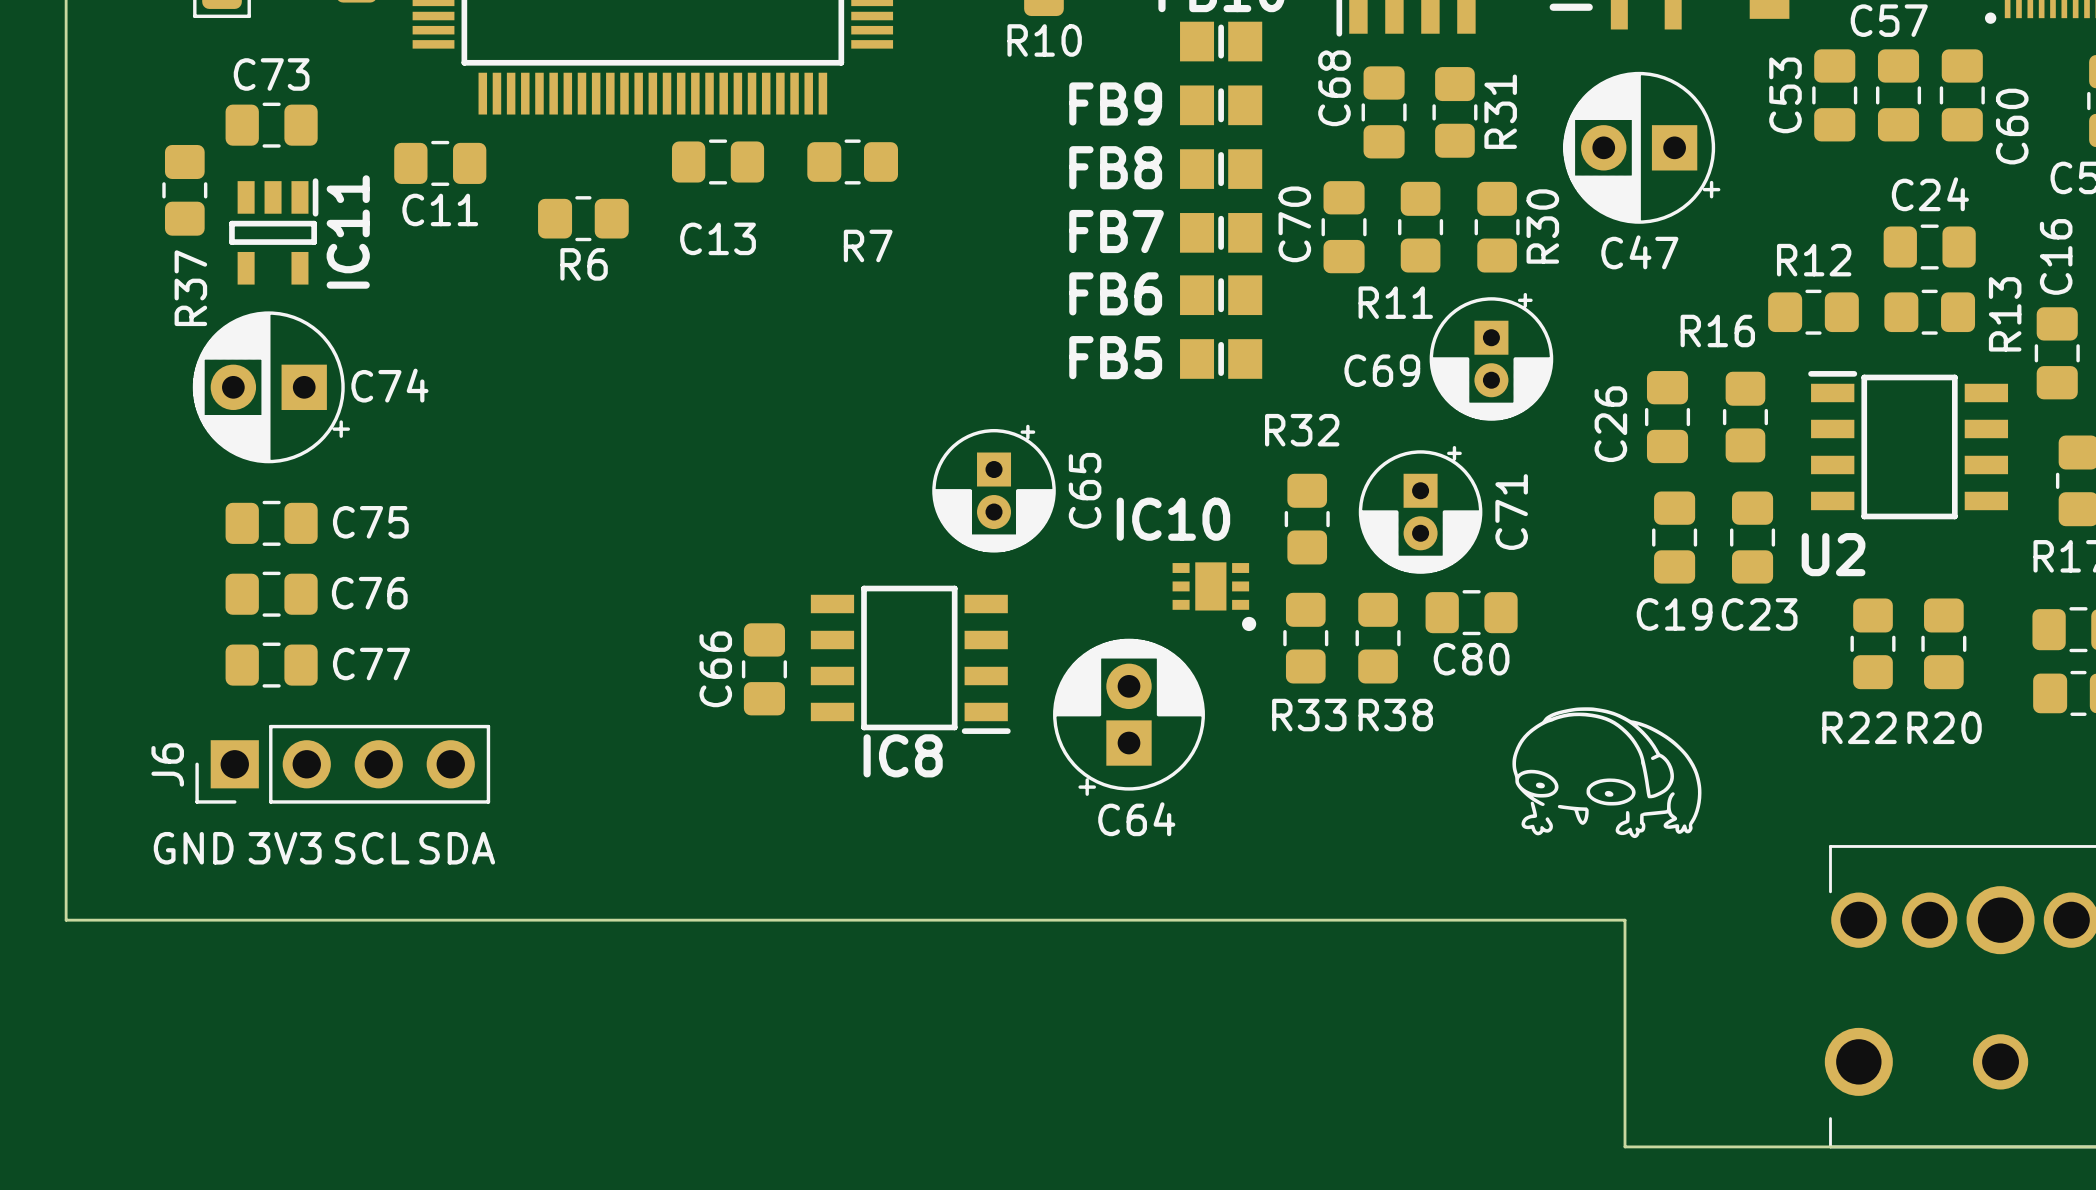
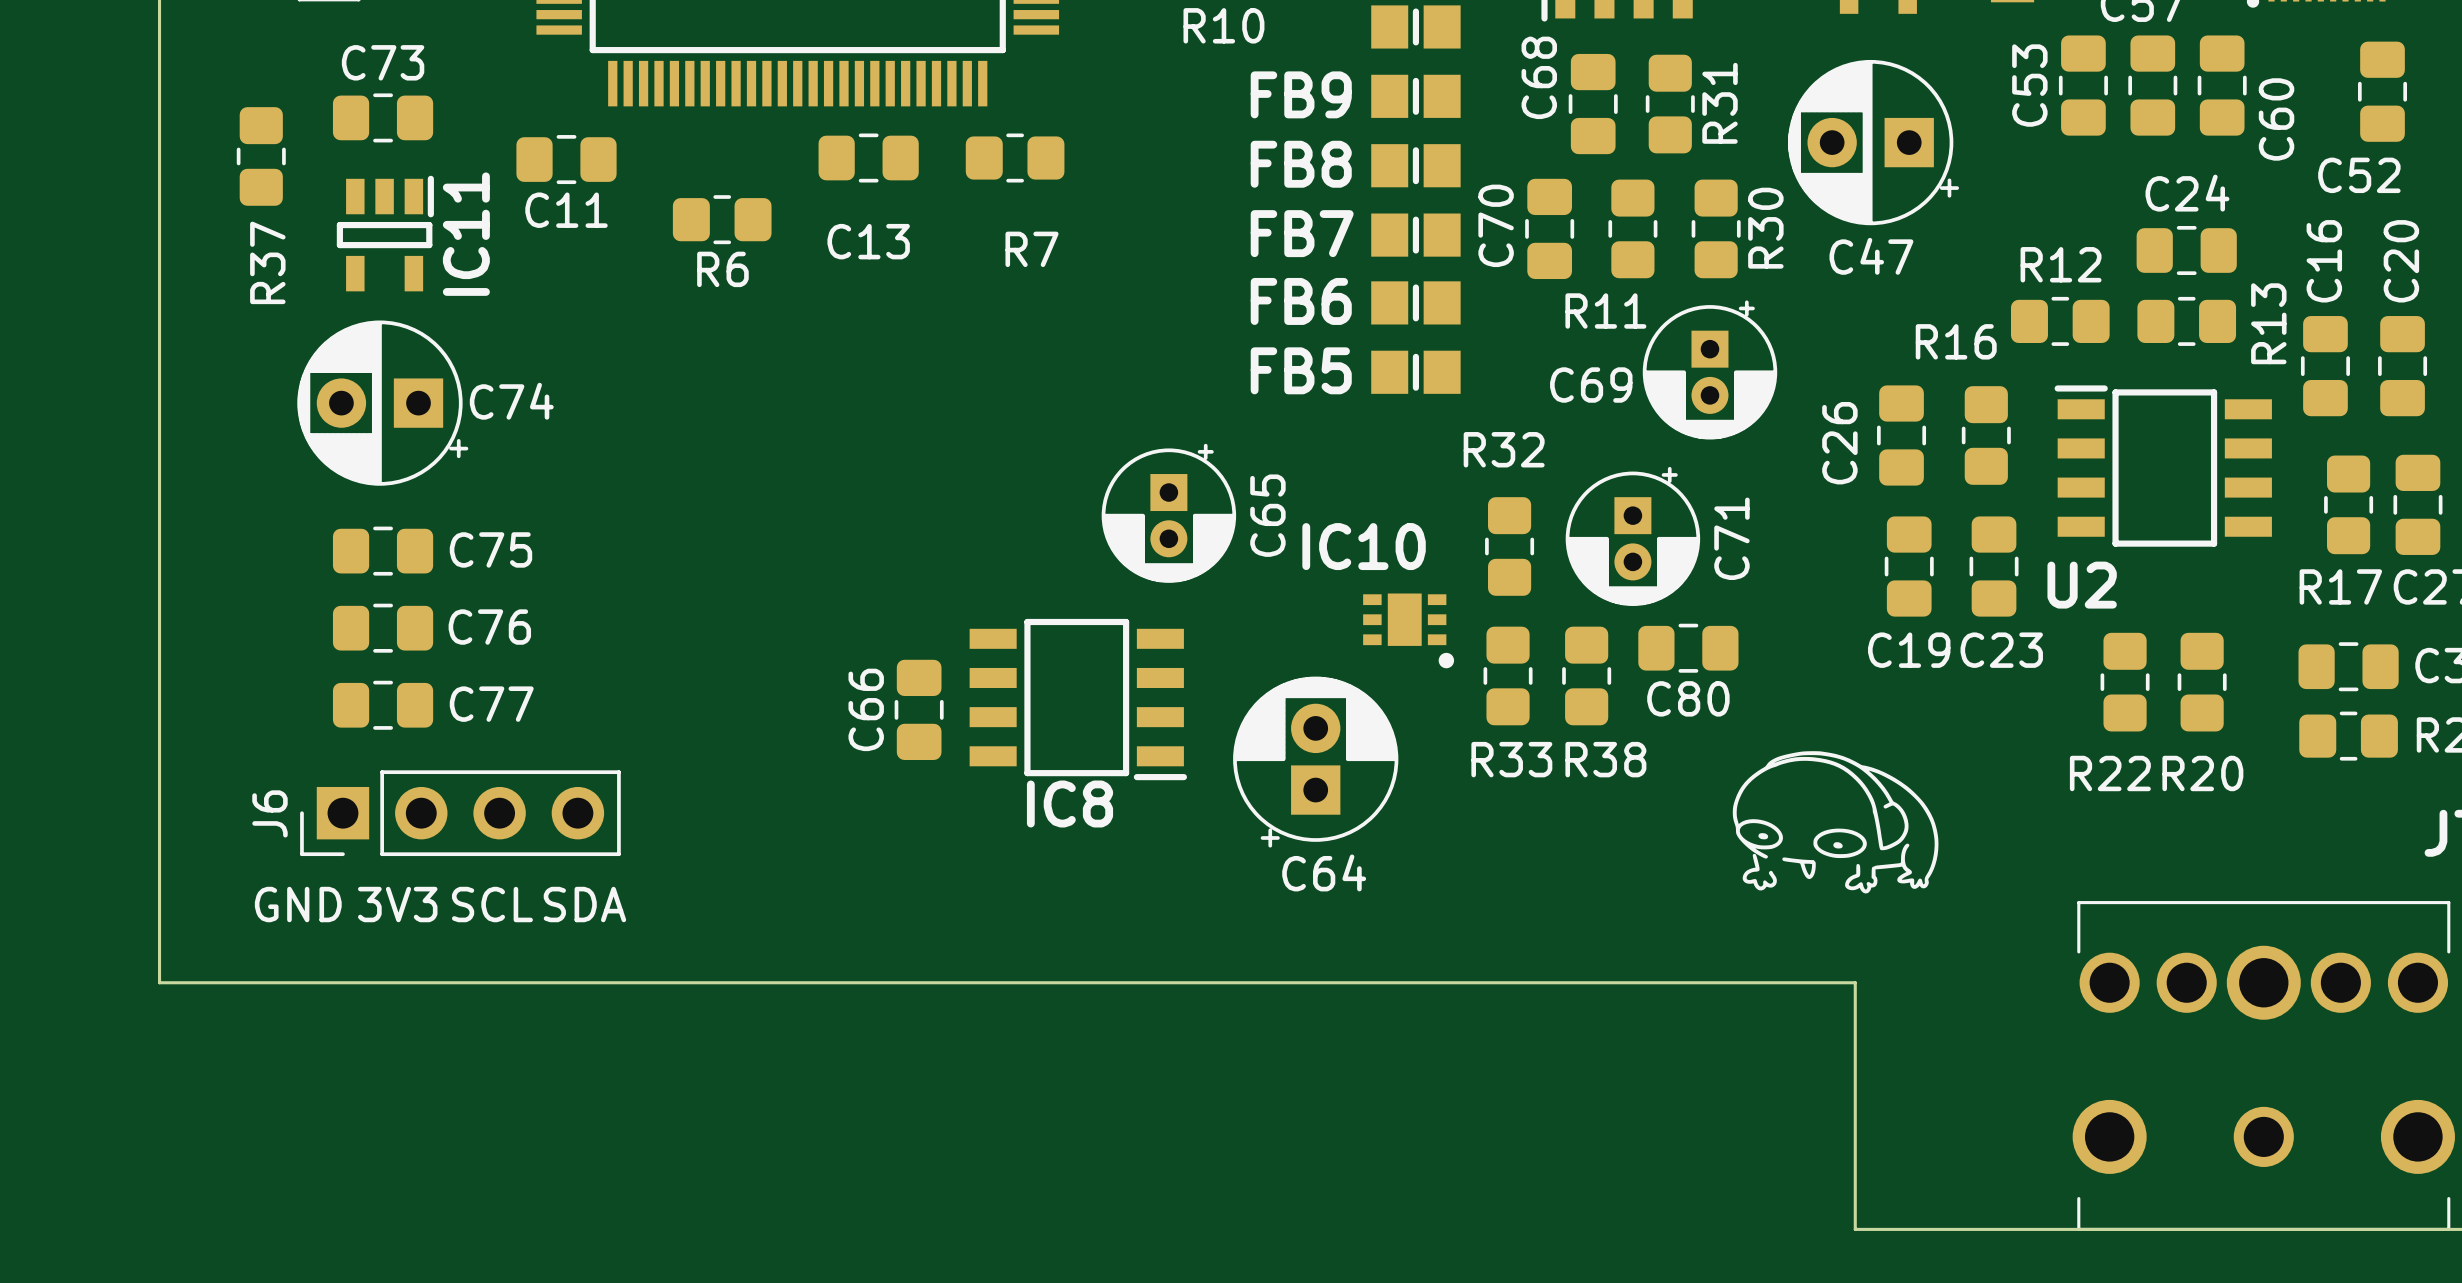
R37 position: (184, 190) -> (261, 156)

